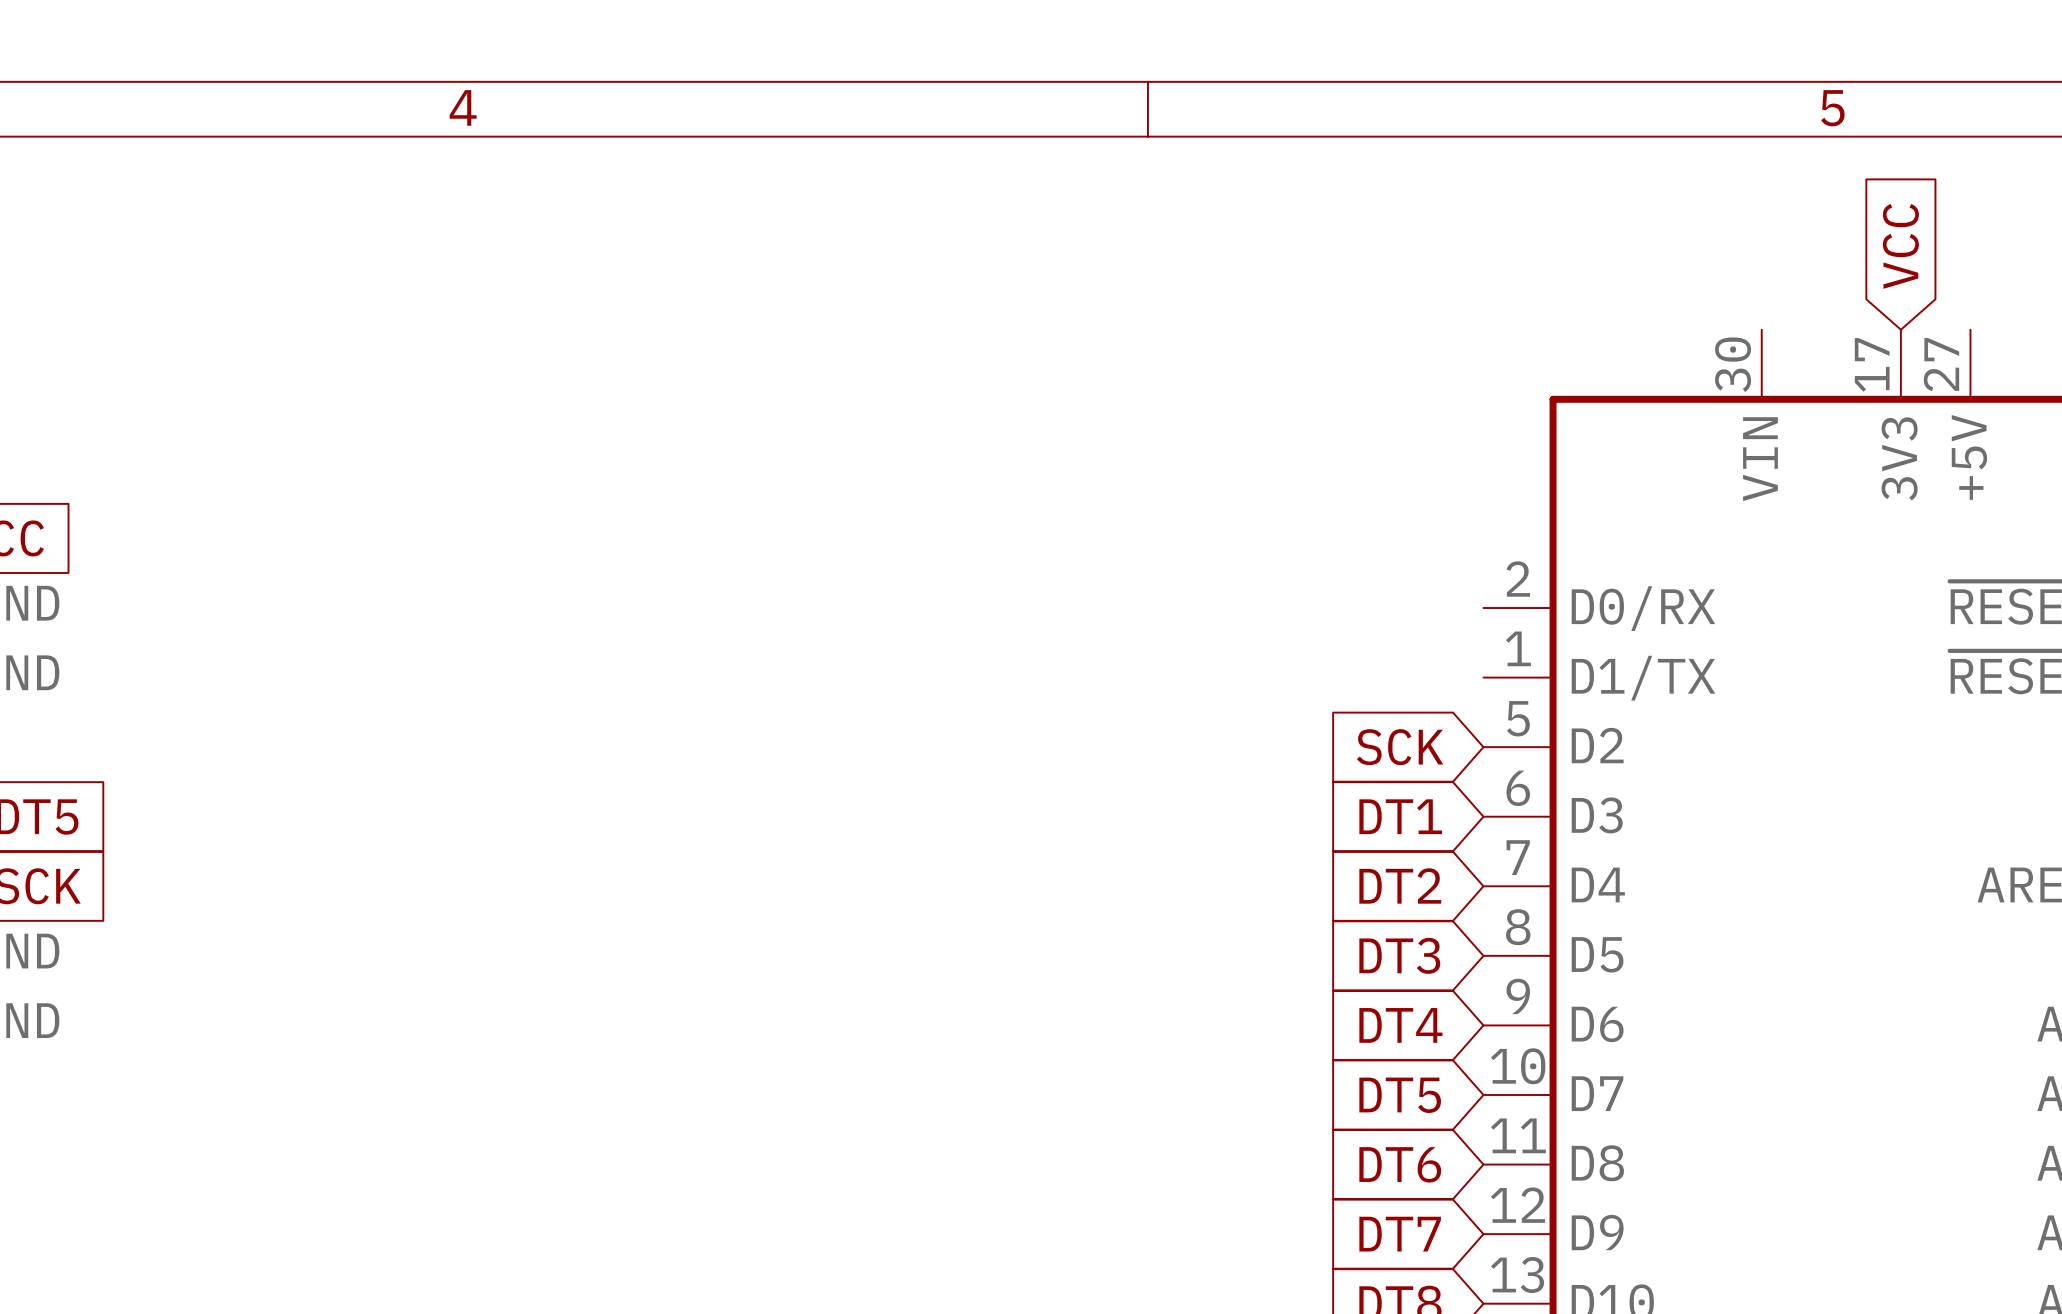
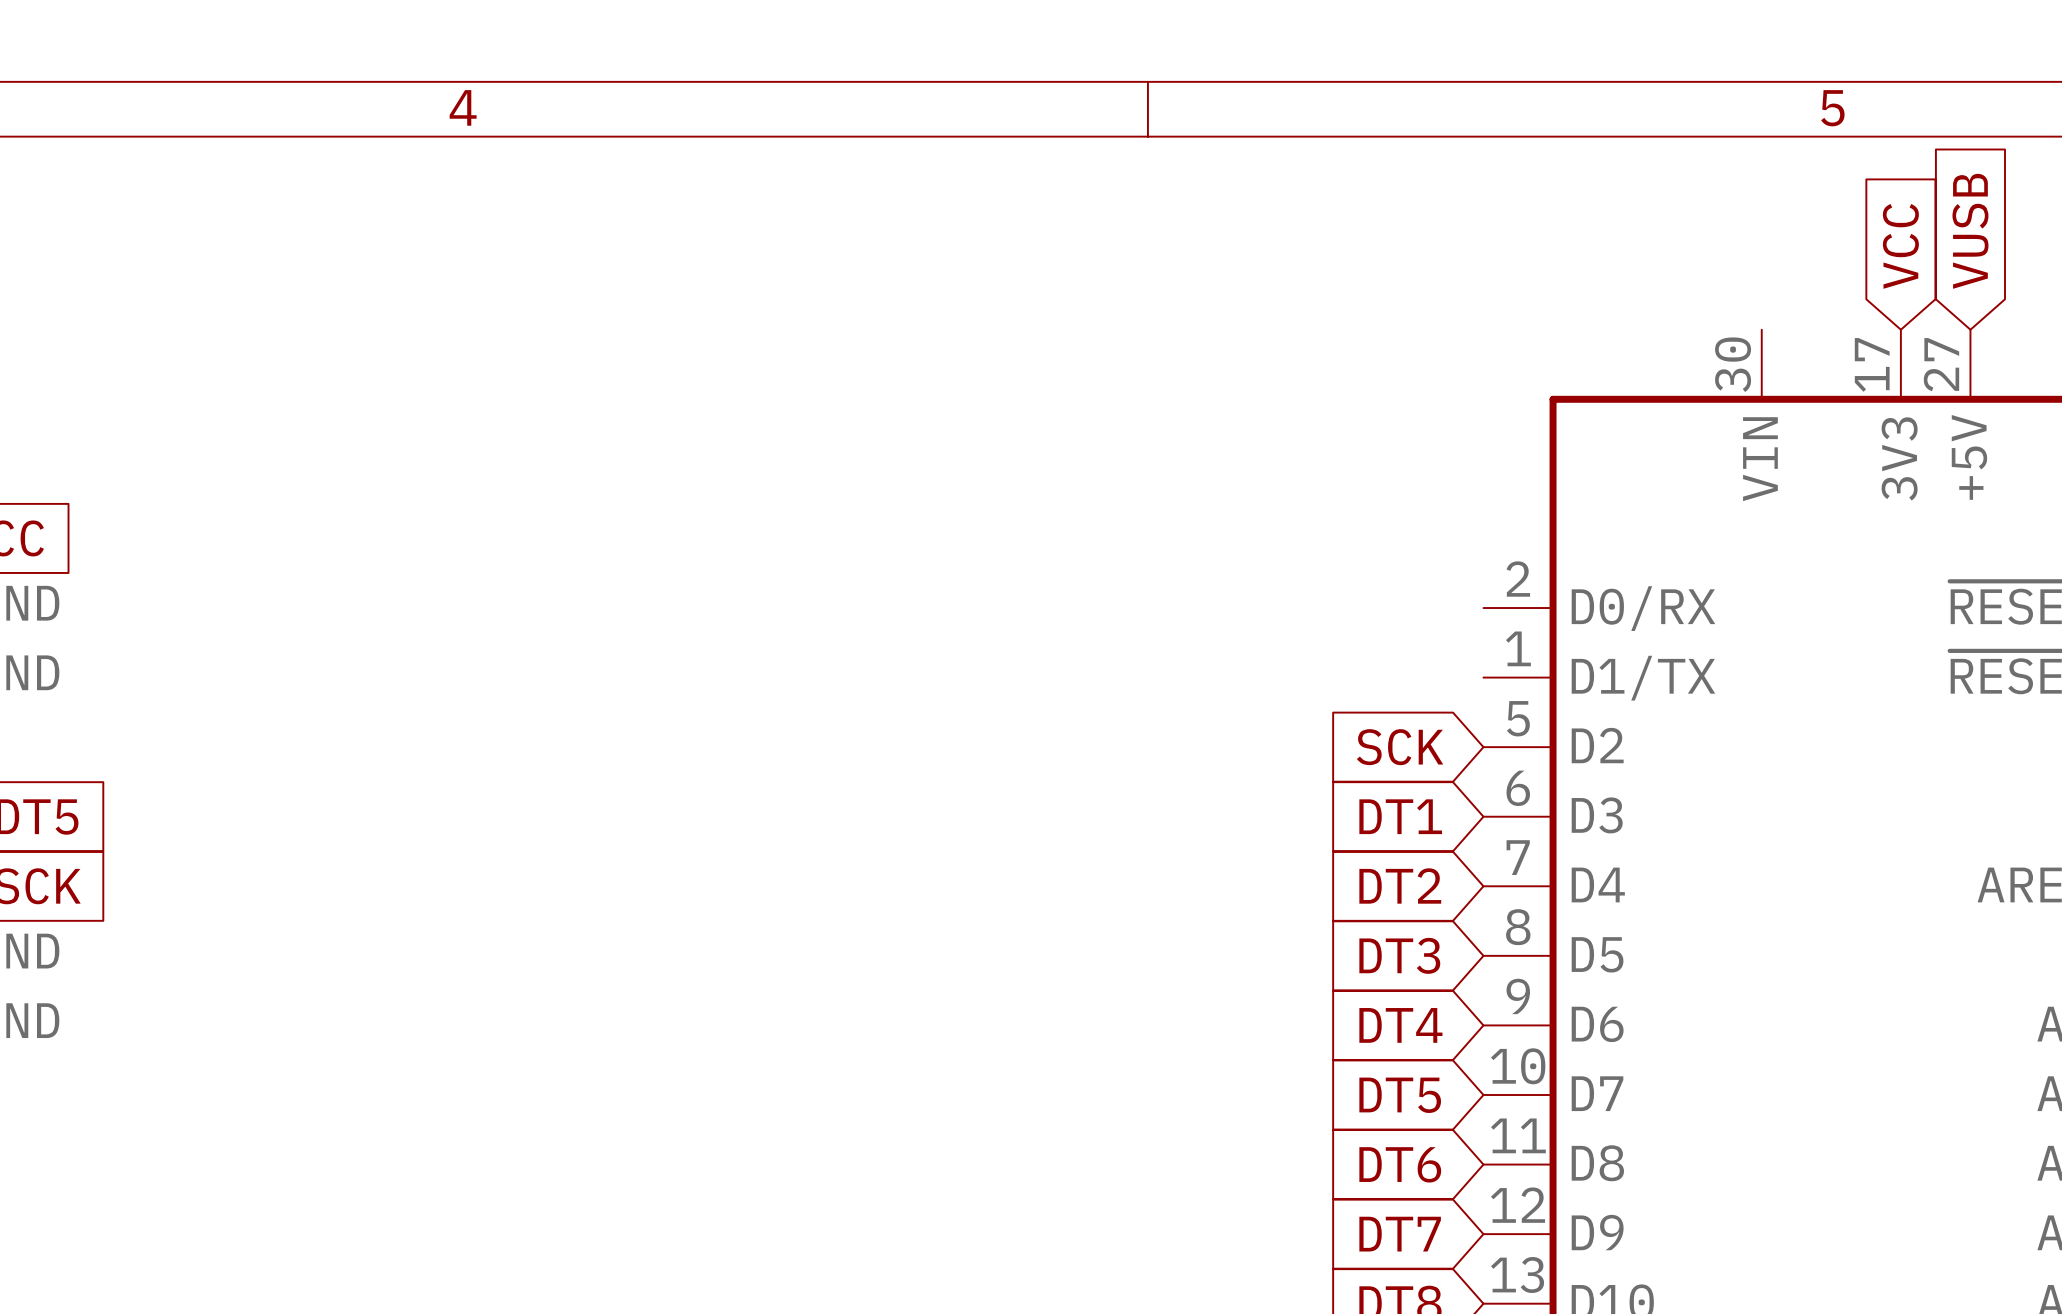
global label: none -> VUSB (1970, 231)

